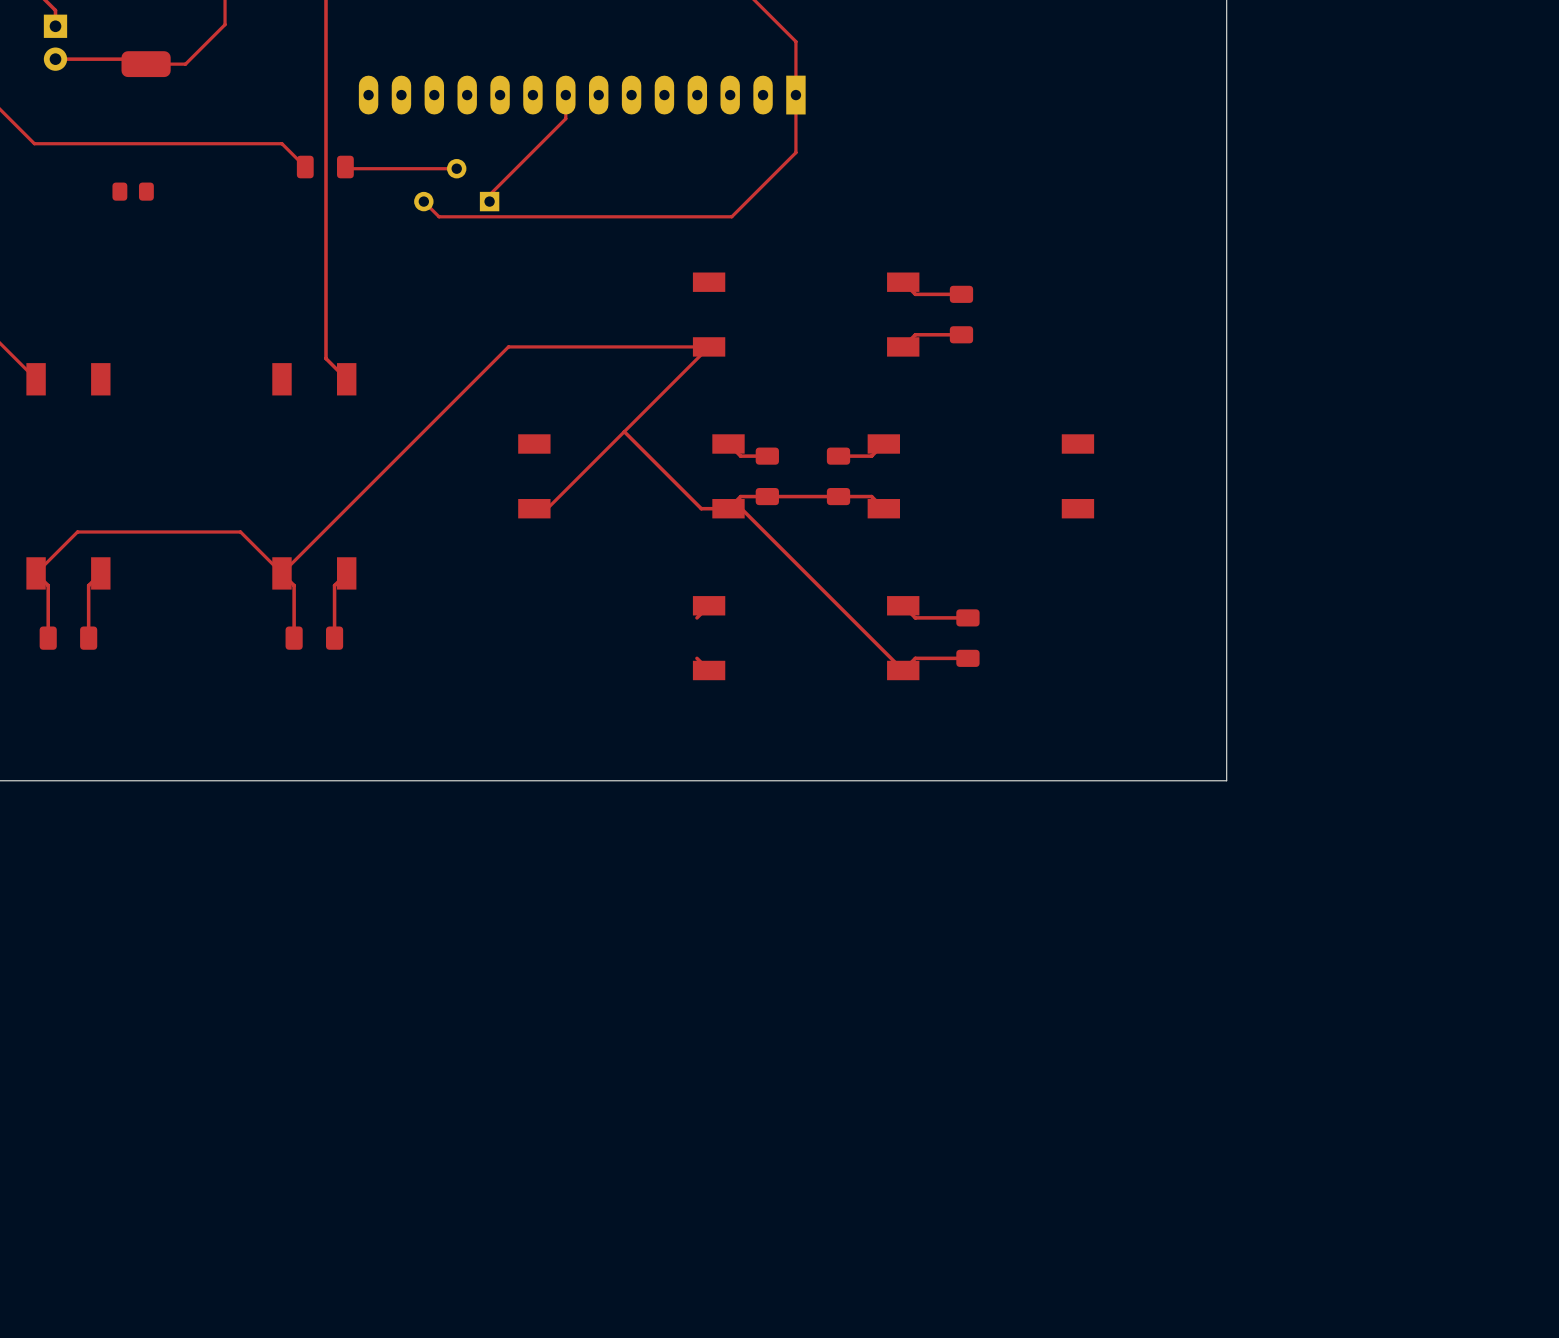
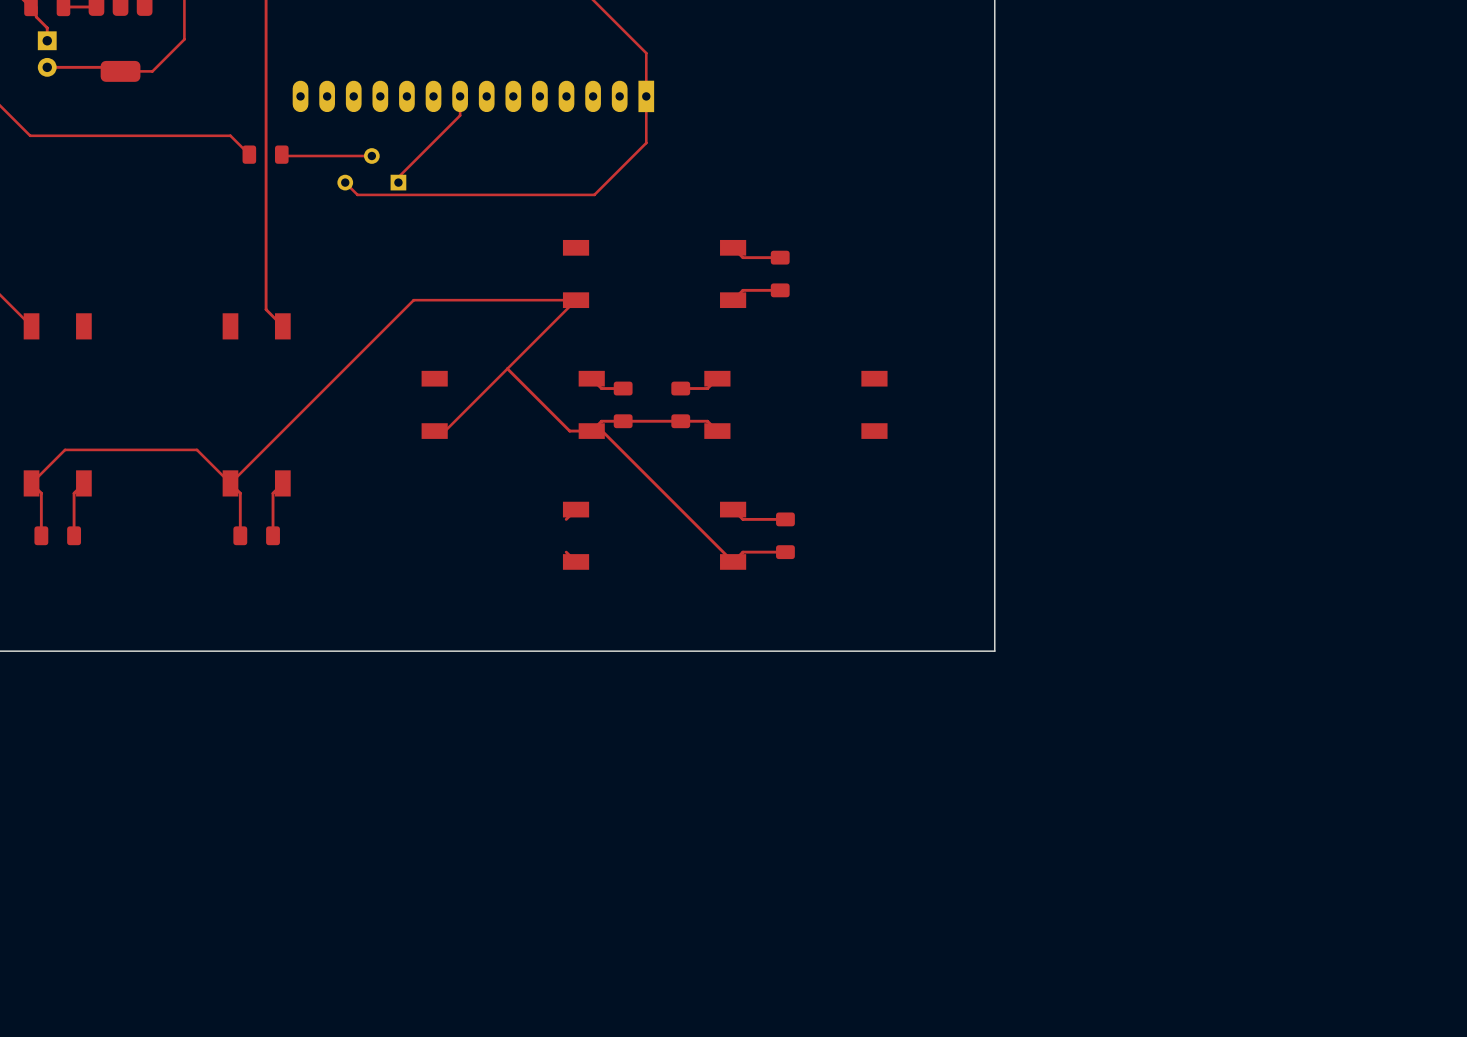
part: (133, 191) -> none

